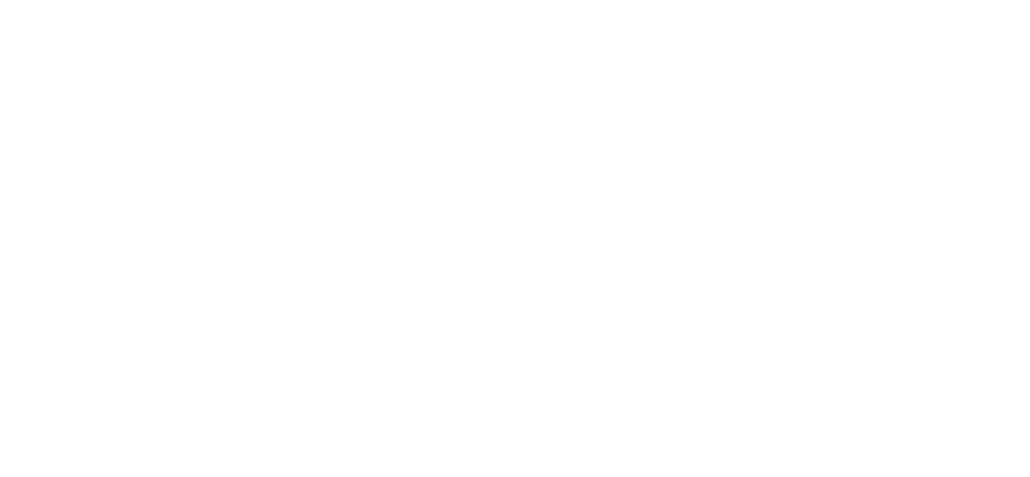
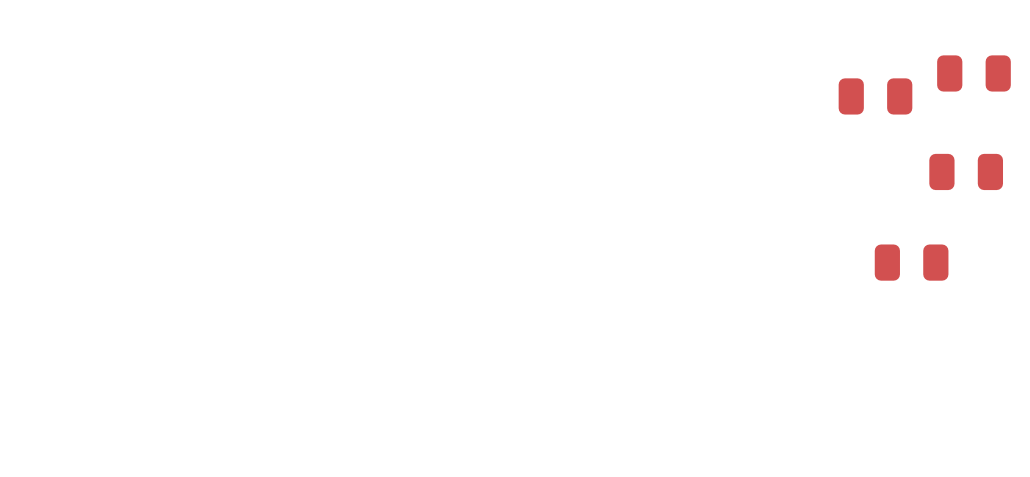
part: none -> (973, 73)
part: none -> (875, 96)
part: none -> (966, 171)
part: none -> (911, 262)

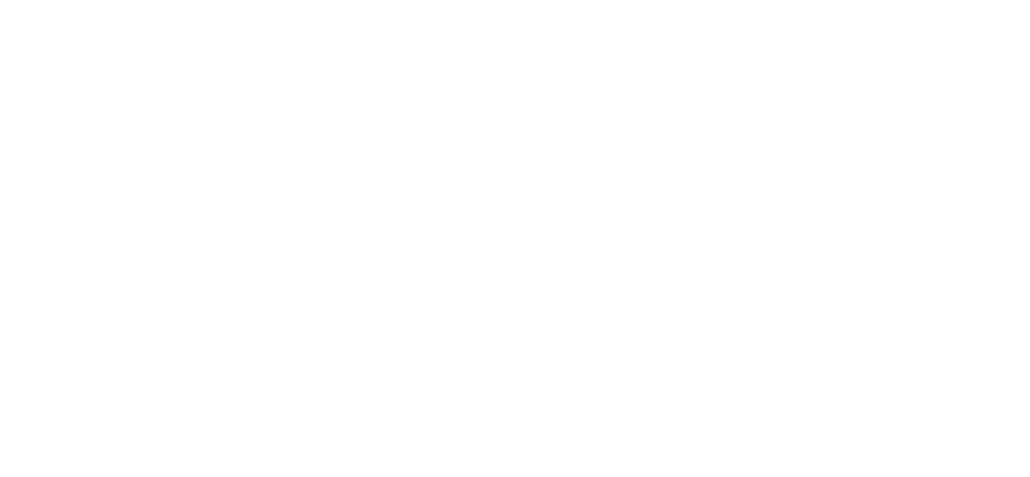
part: (973, 73) -> none
part: (875, 96) -> none
part: (966, 171) -> none
part: (911, 262) -> none

